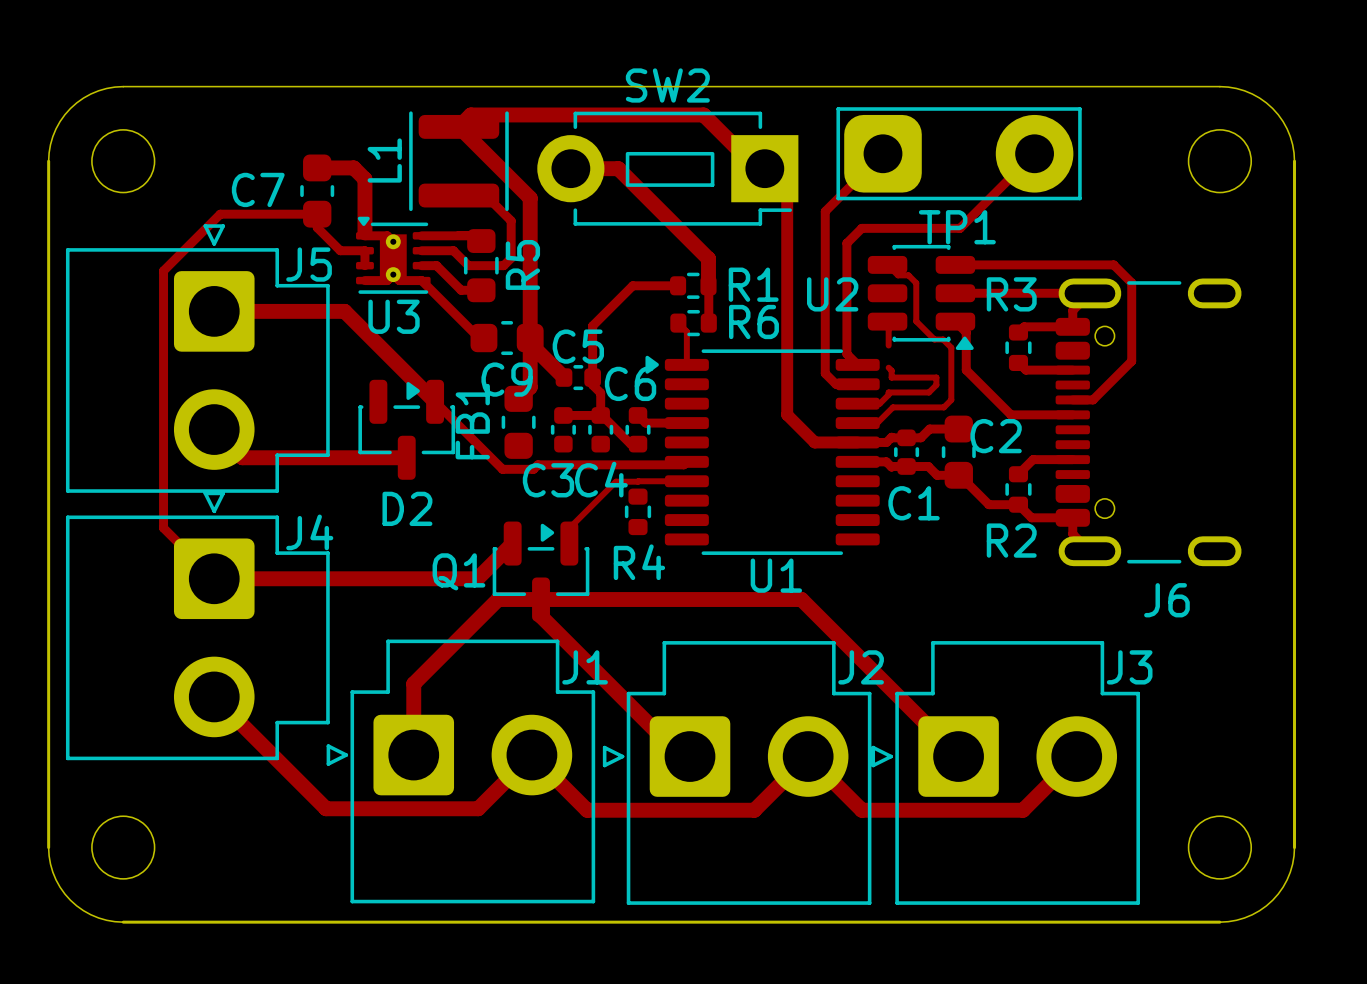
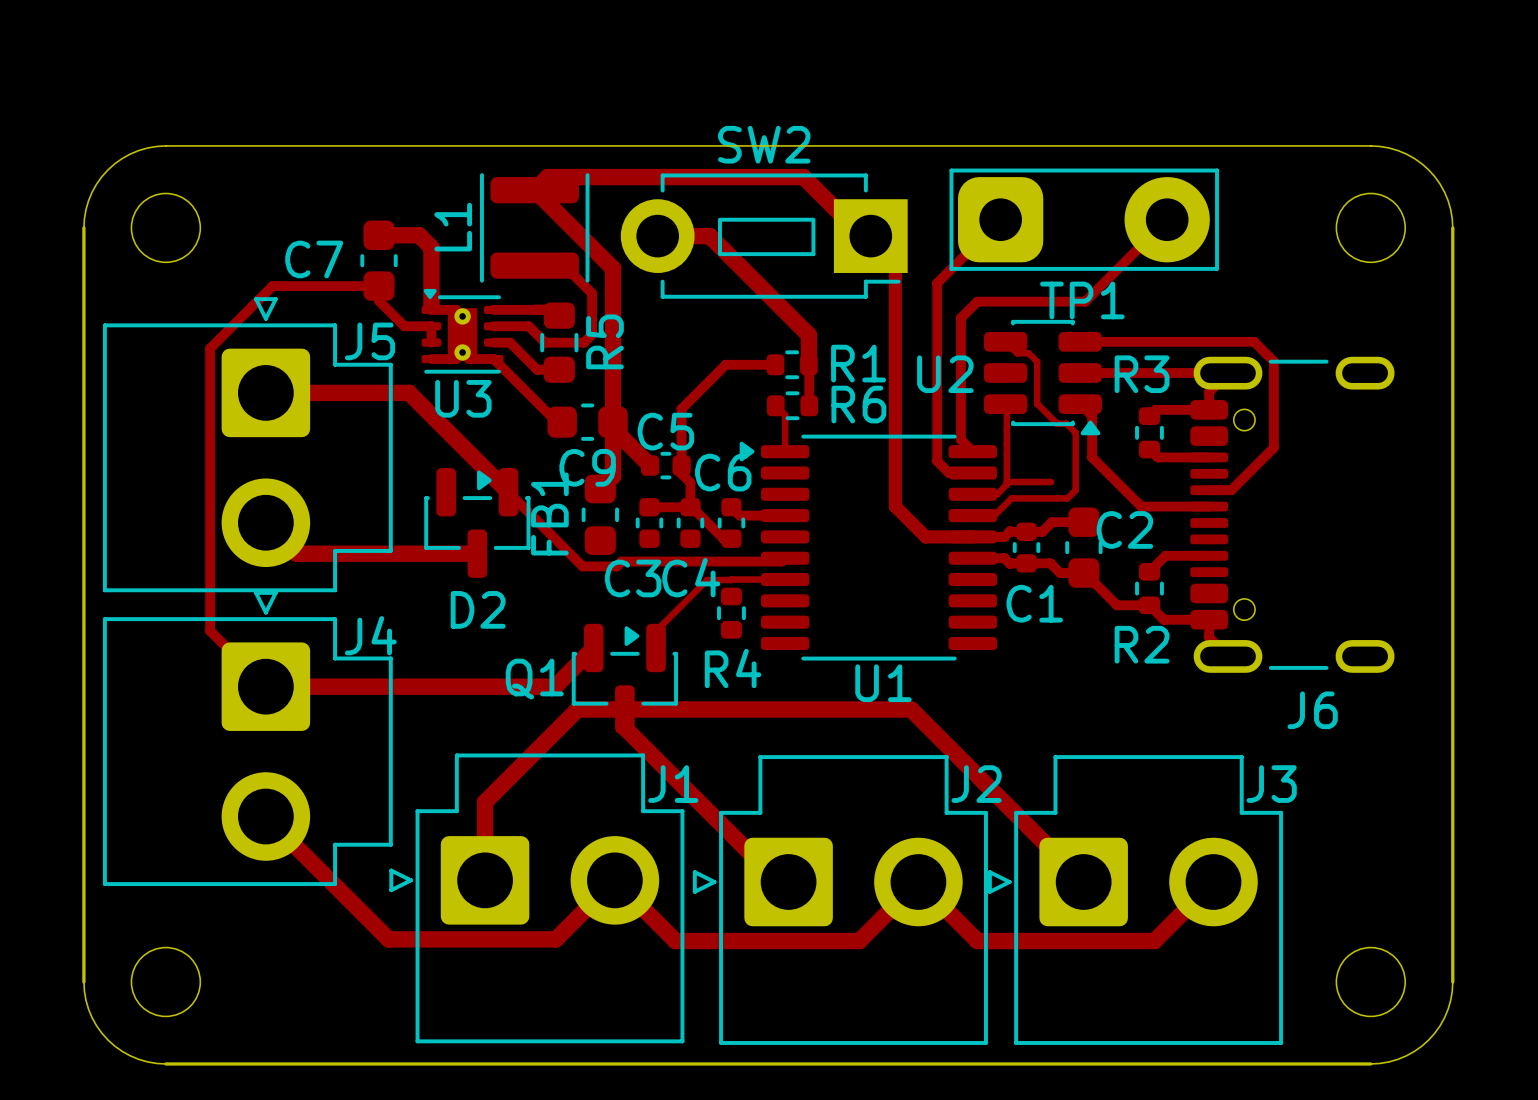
track: none -> (1006, 430) (1006, 482)
track: (888, 367) (891, 370) (891, 377) (936, 377) (936, 385) (928, 392) -> none

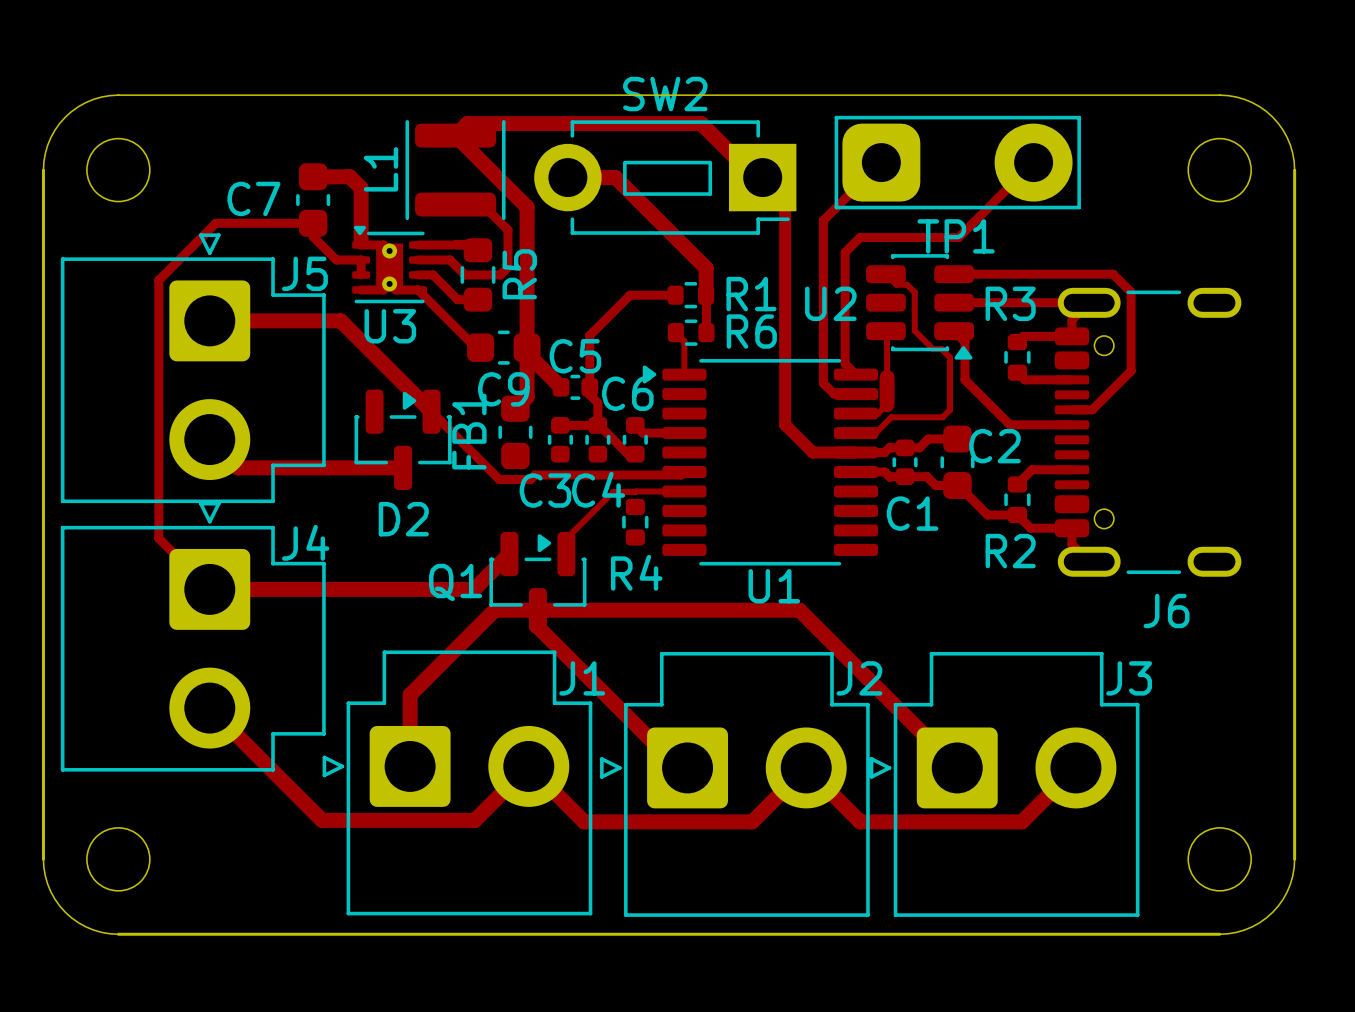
track width: thin (1006, 454) (1006, 484) -> thick (887, 377) (887, 404)
track: (1006, 482) (1051, 482) -> none

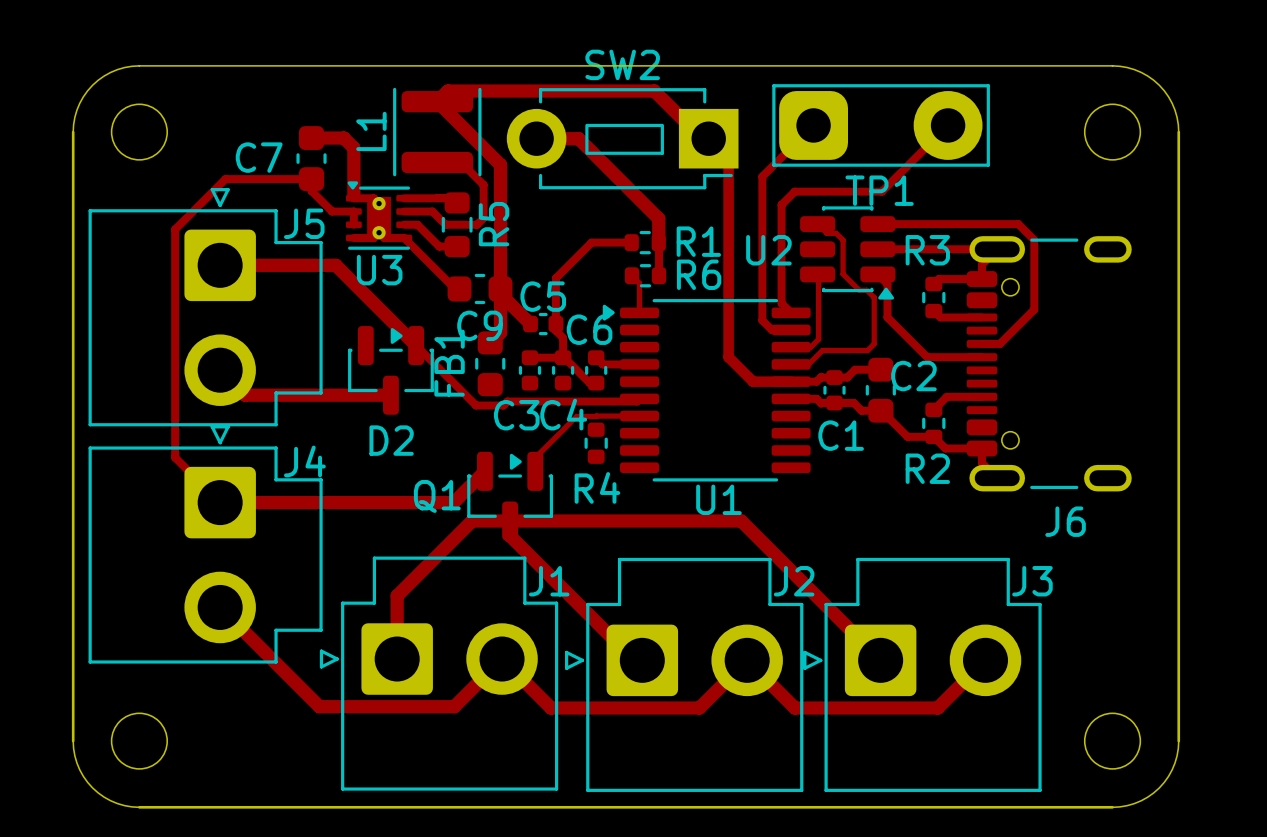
track width: thick (887, 377) (887, 404) -> thin (818, 315) (818, 339)

